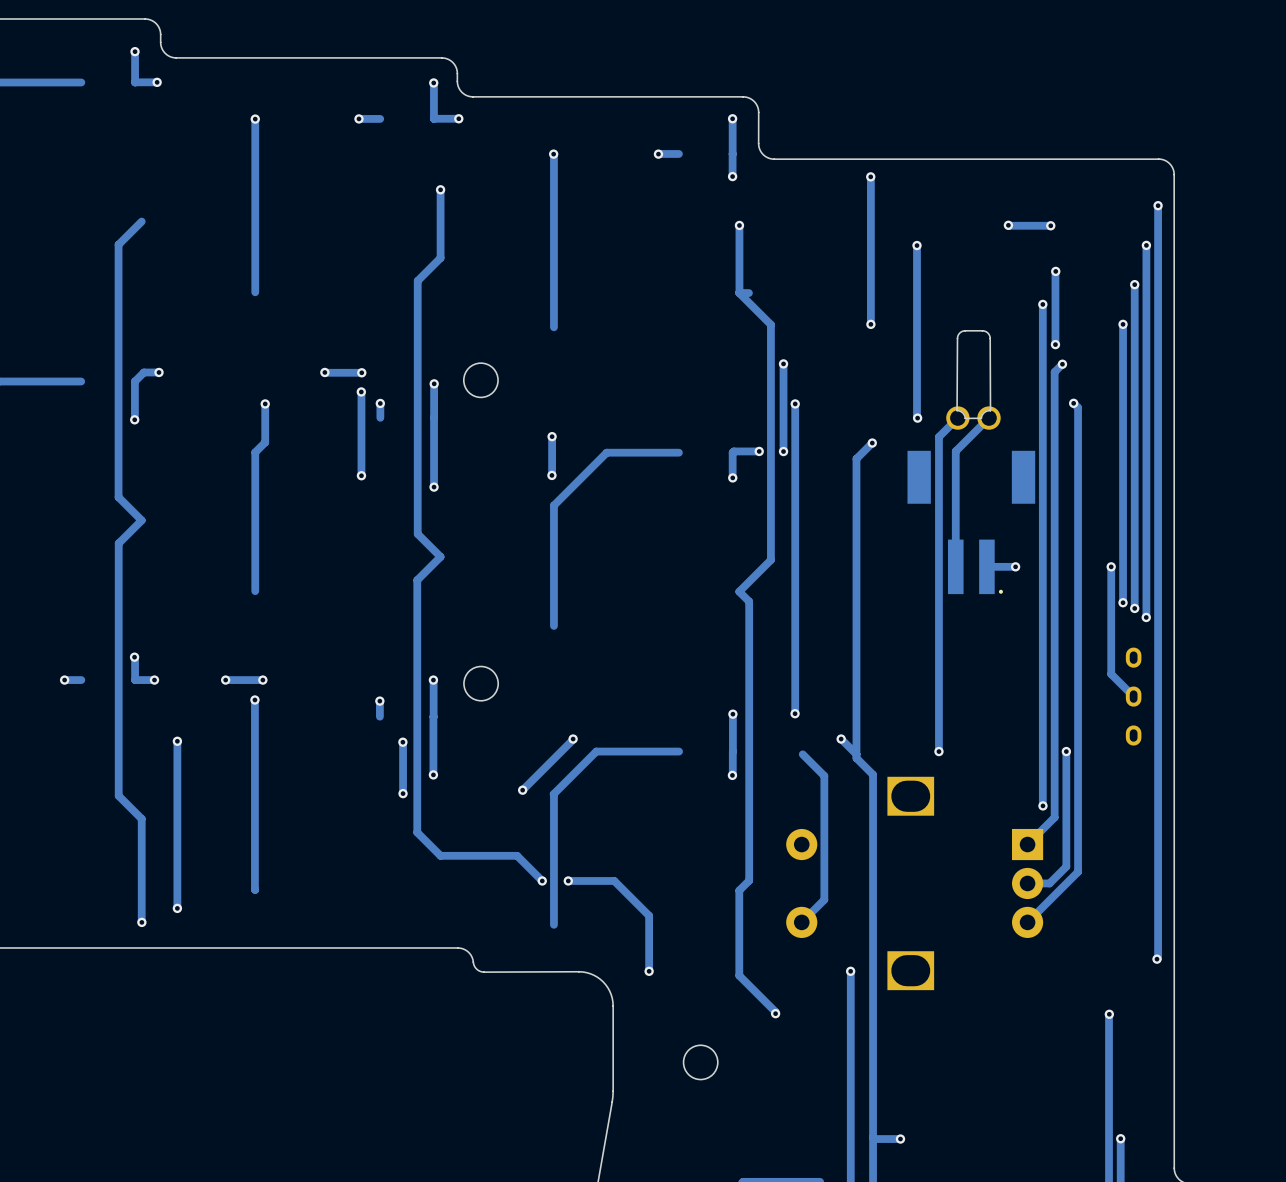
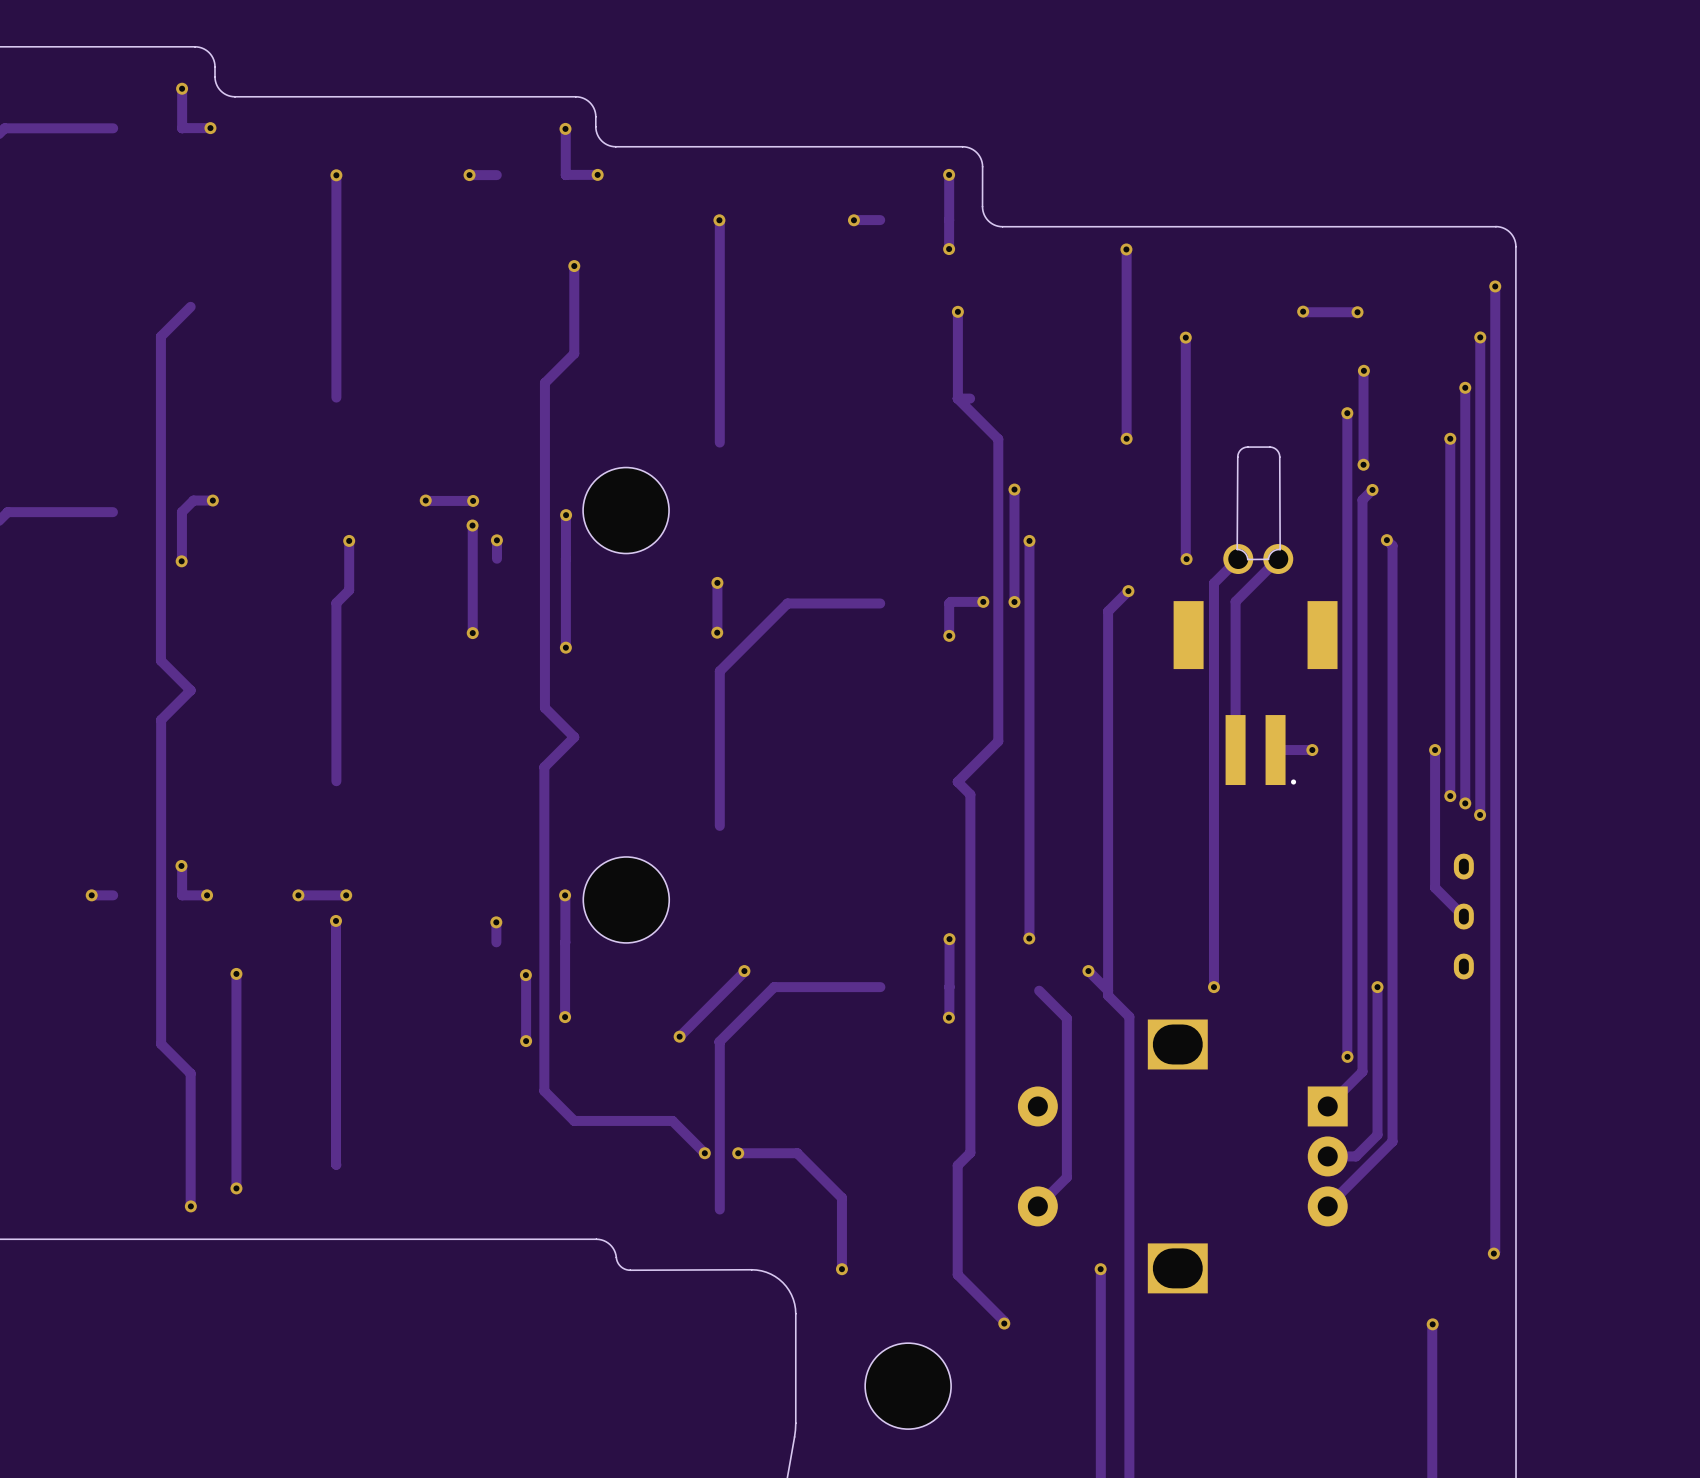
drawing: [463, 363, 499, 398] -> none
part: none -> (626, 510)
drawing: [463, 666, 499, 701] -> none
part: none -> (626, 899)
drawing: [683, 1045, 718, 1080] -> none
part: none -> (908, 1386)

